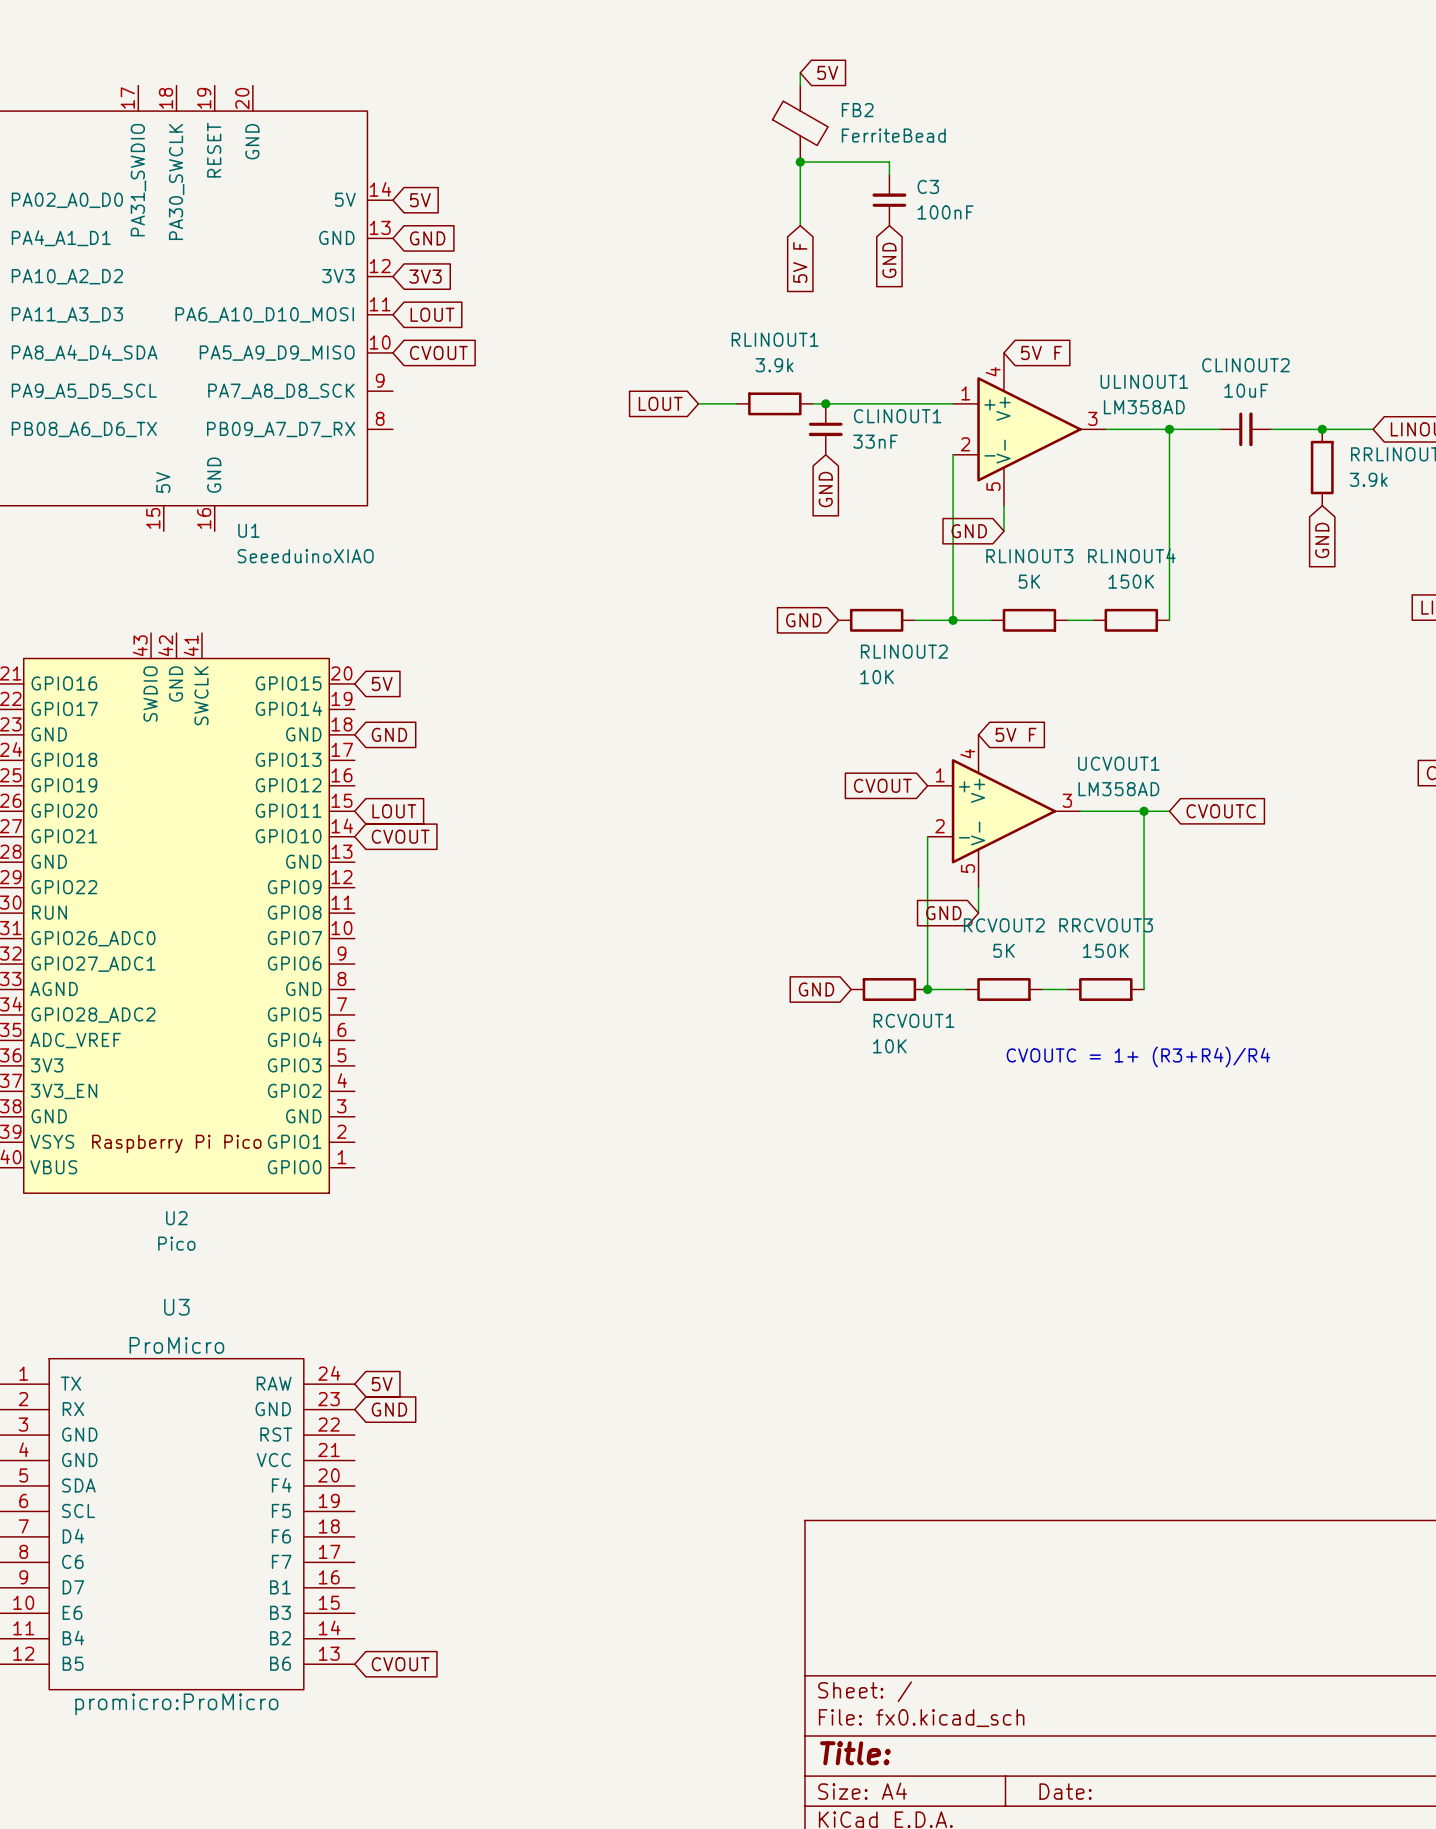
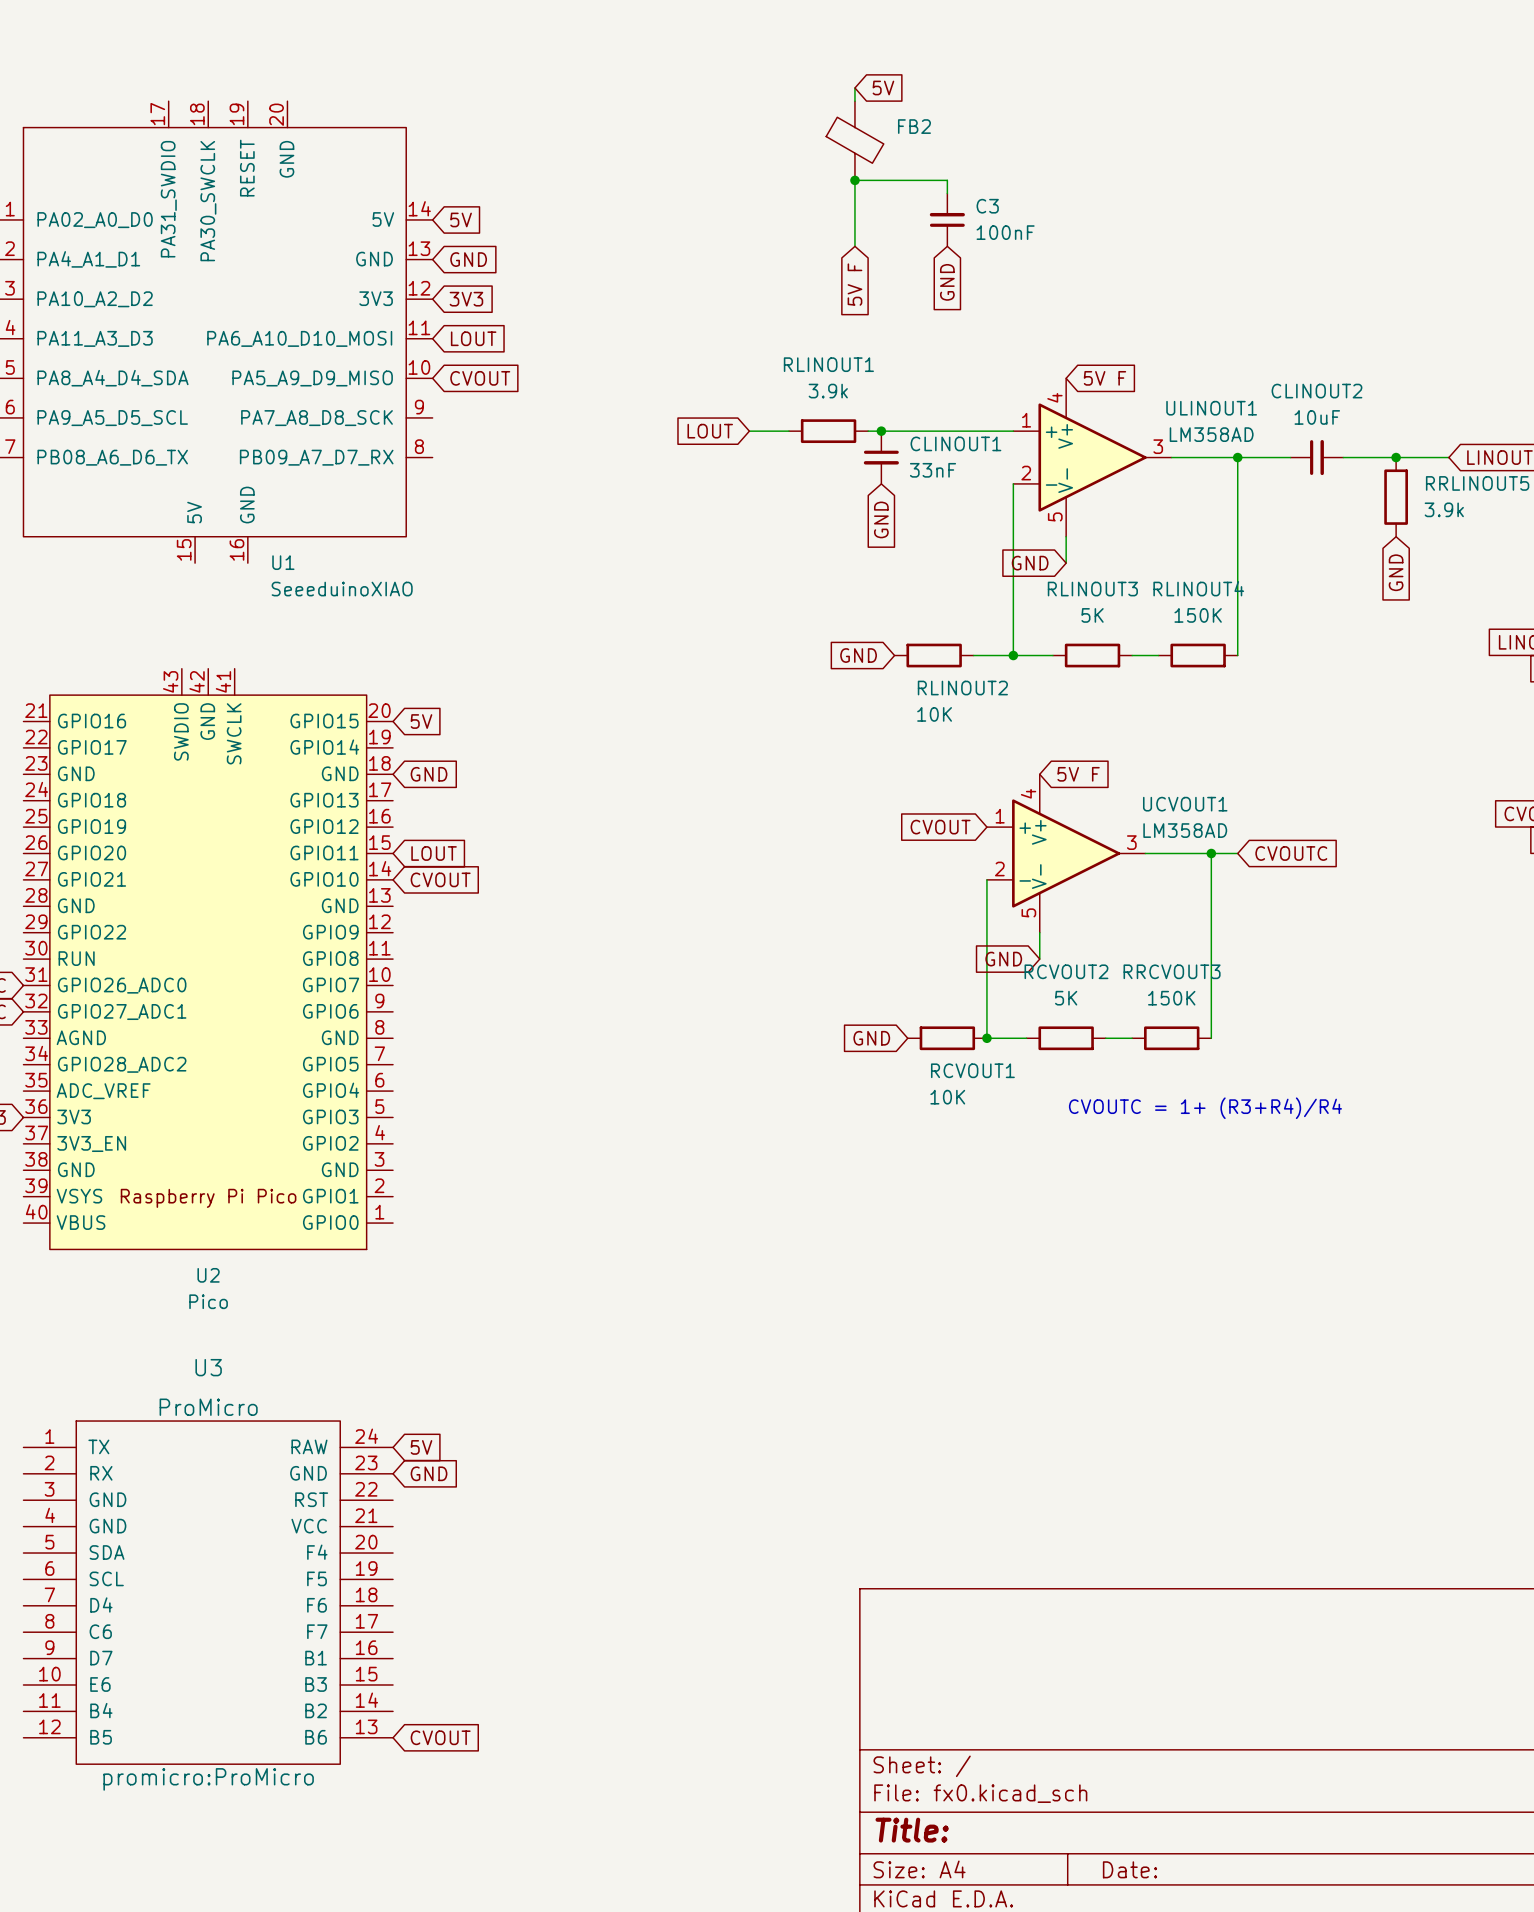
FB2 value: FerriteBead (893, 135) -> none

